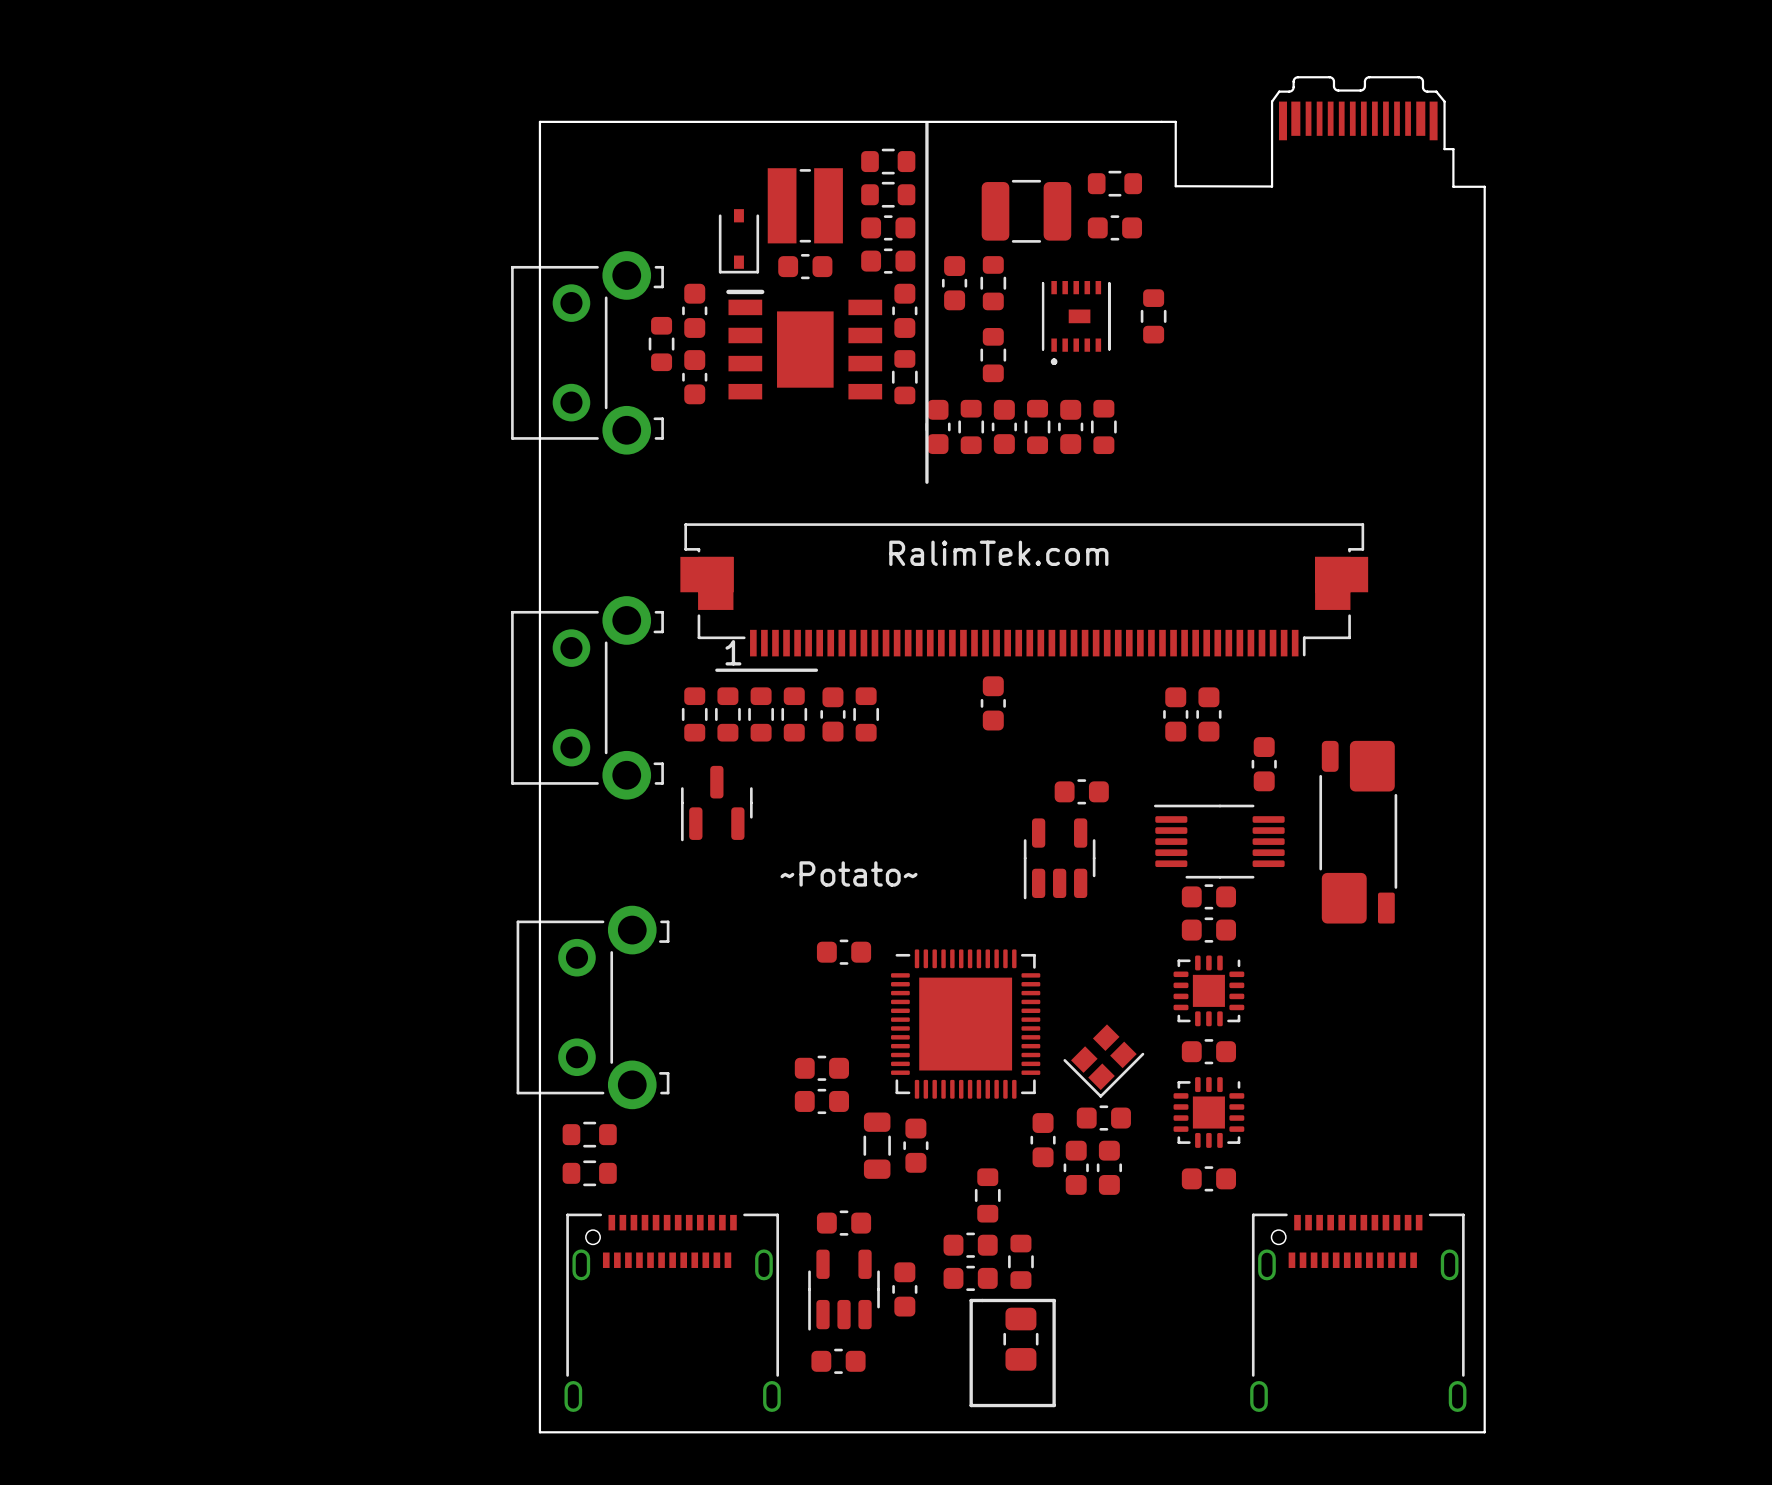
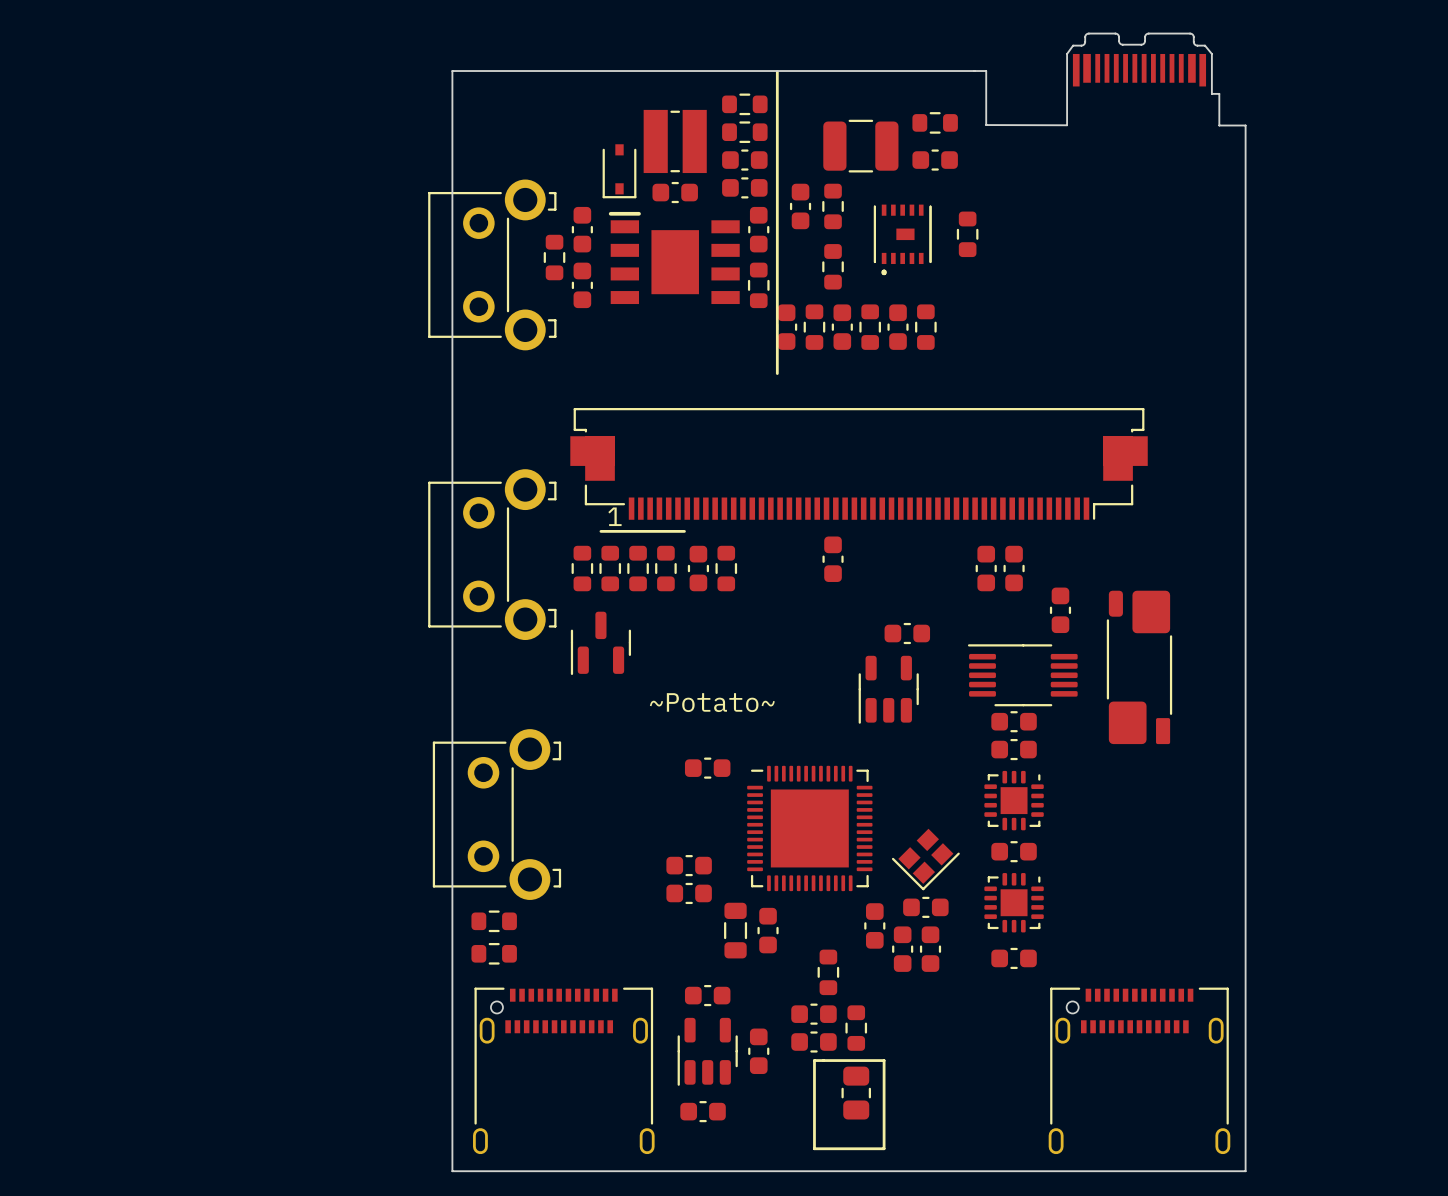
text: RalimTek.com (998, 553) -> none

